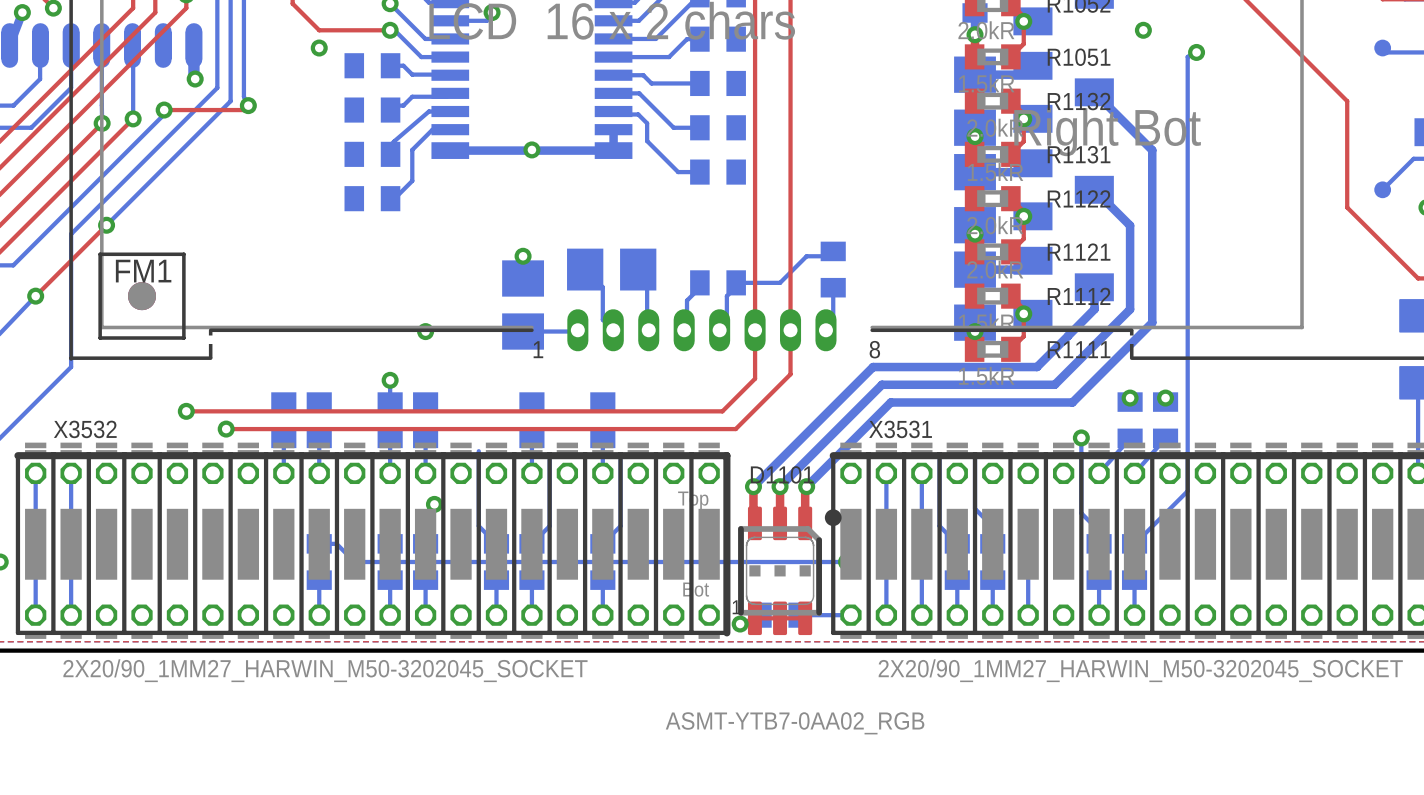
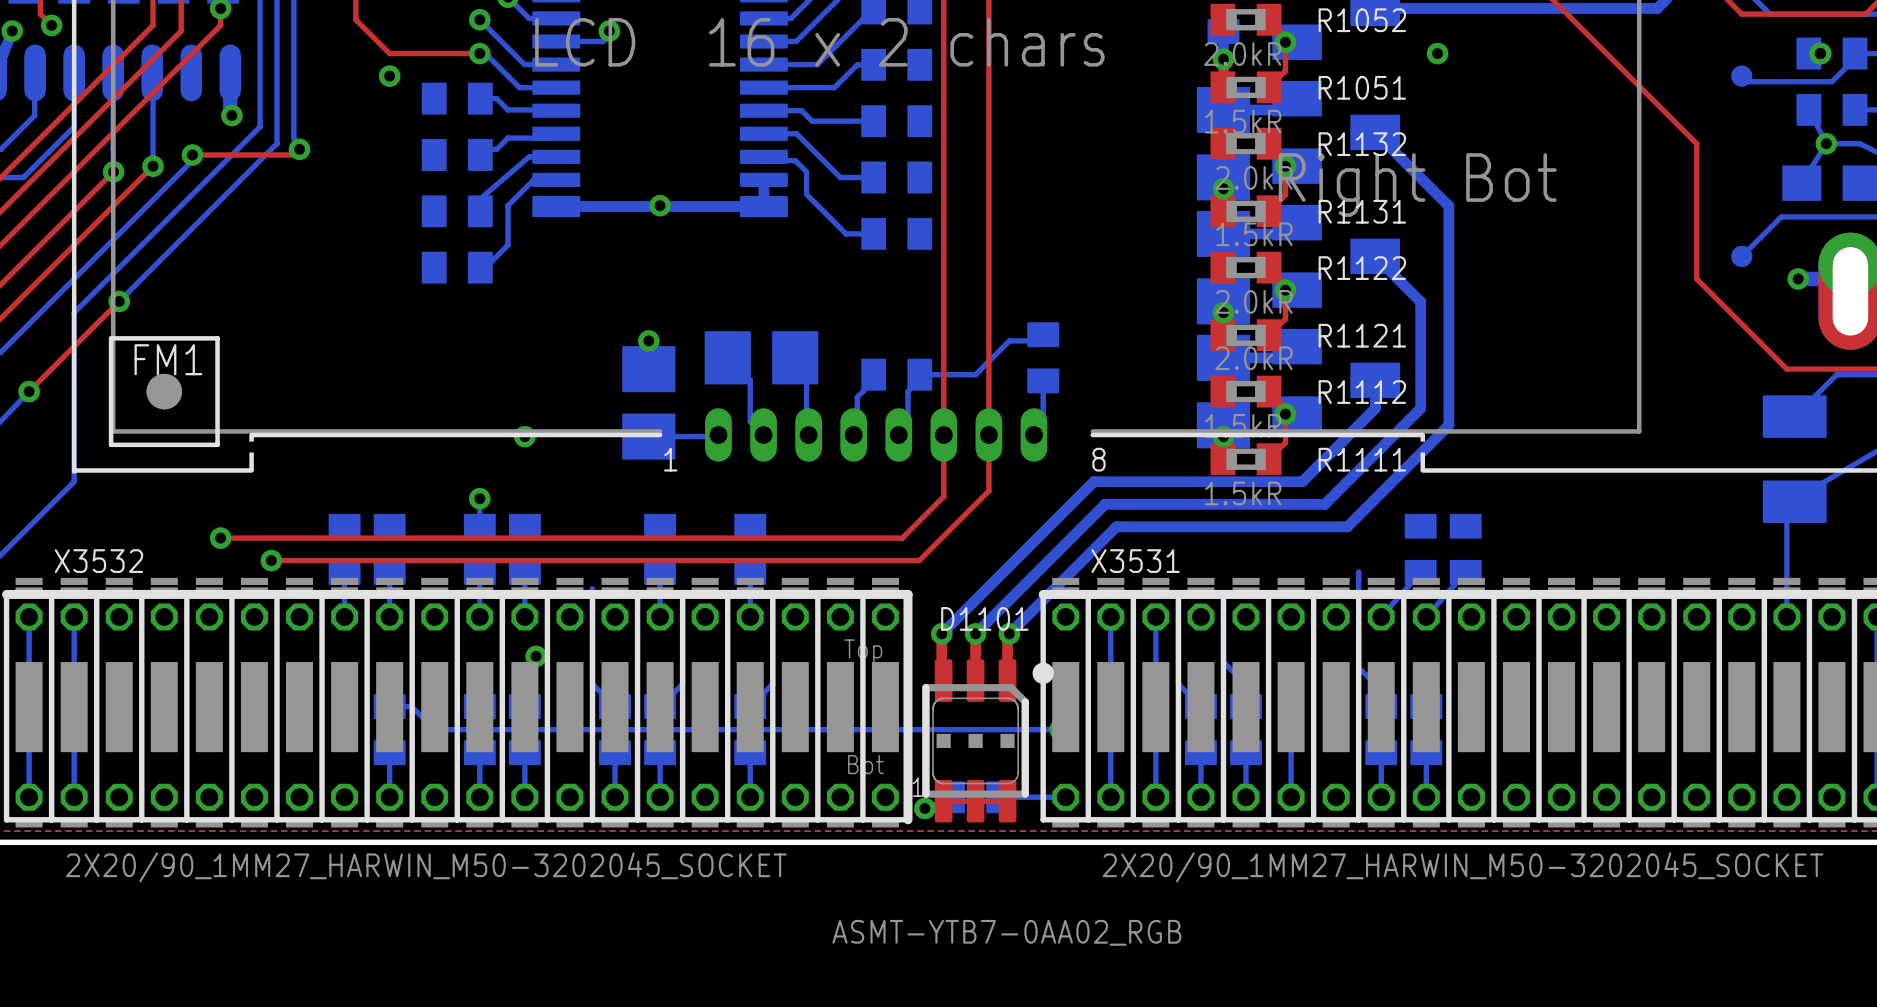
bottom track: (1196, 52) (1187, 56) (1187, 491) (1134, 543) -> none
via: (1196, 52) -> none
via: (1130, 398) -> none
via: (1165, 398) -> none
via: (1081, 437) -> none

